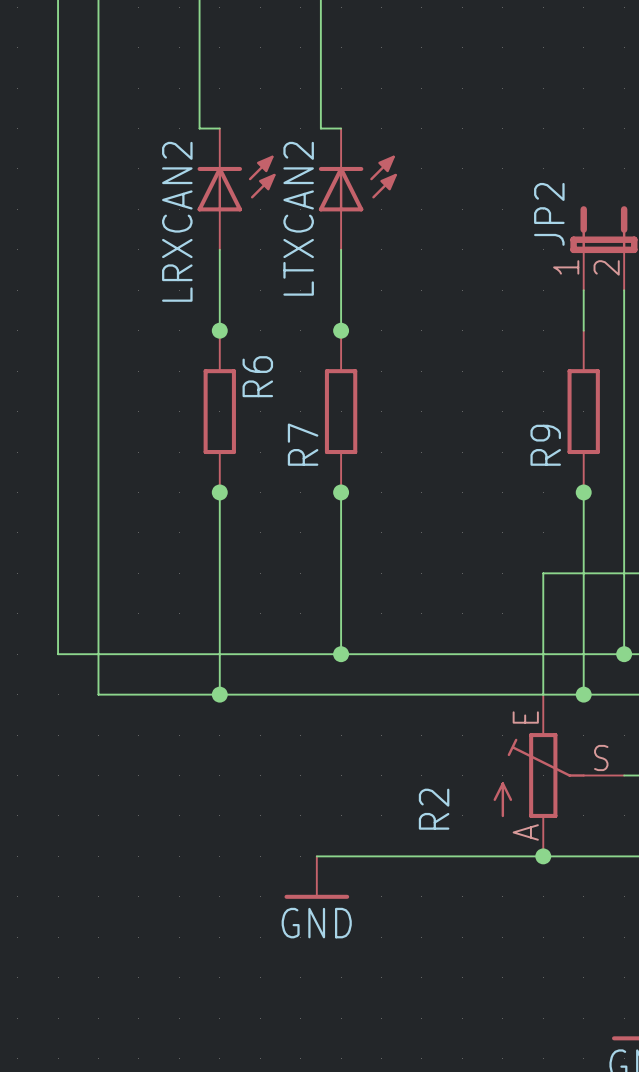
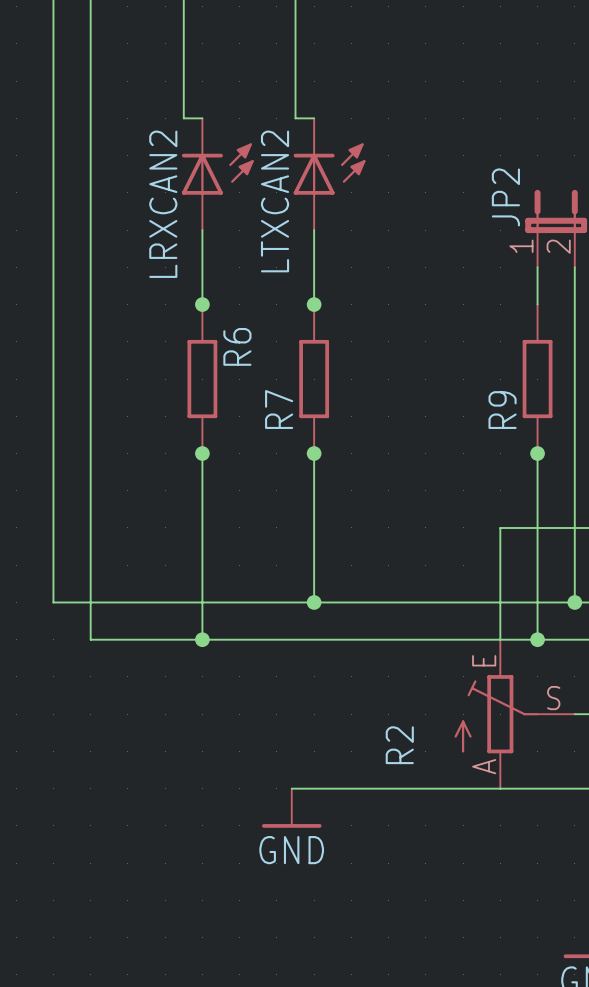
junction: (543, 856) -> none

